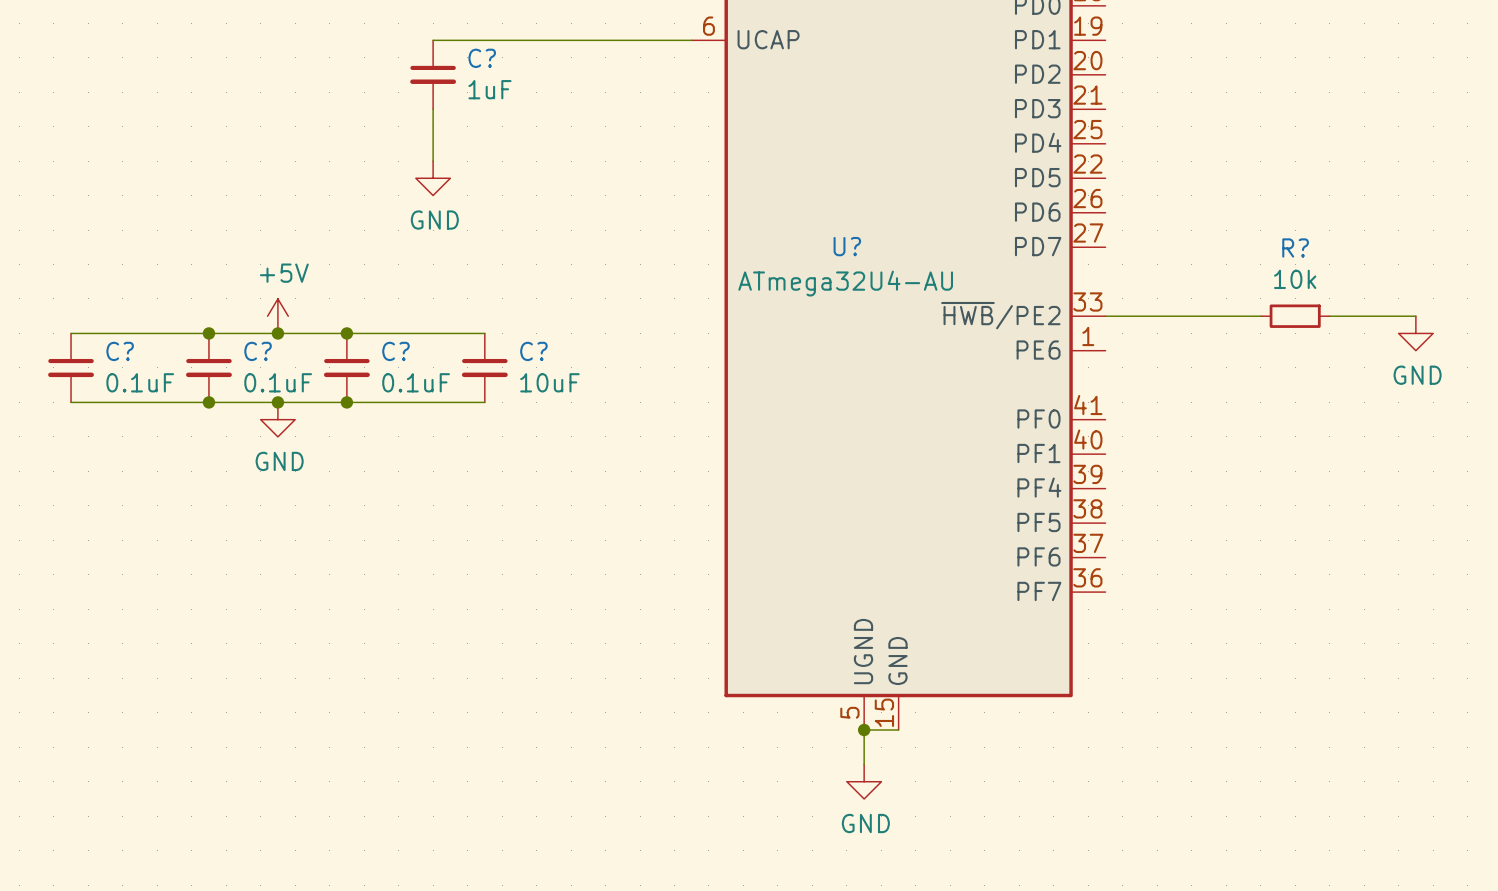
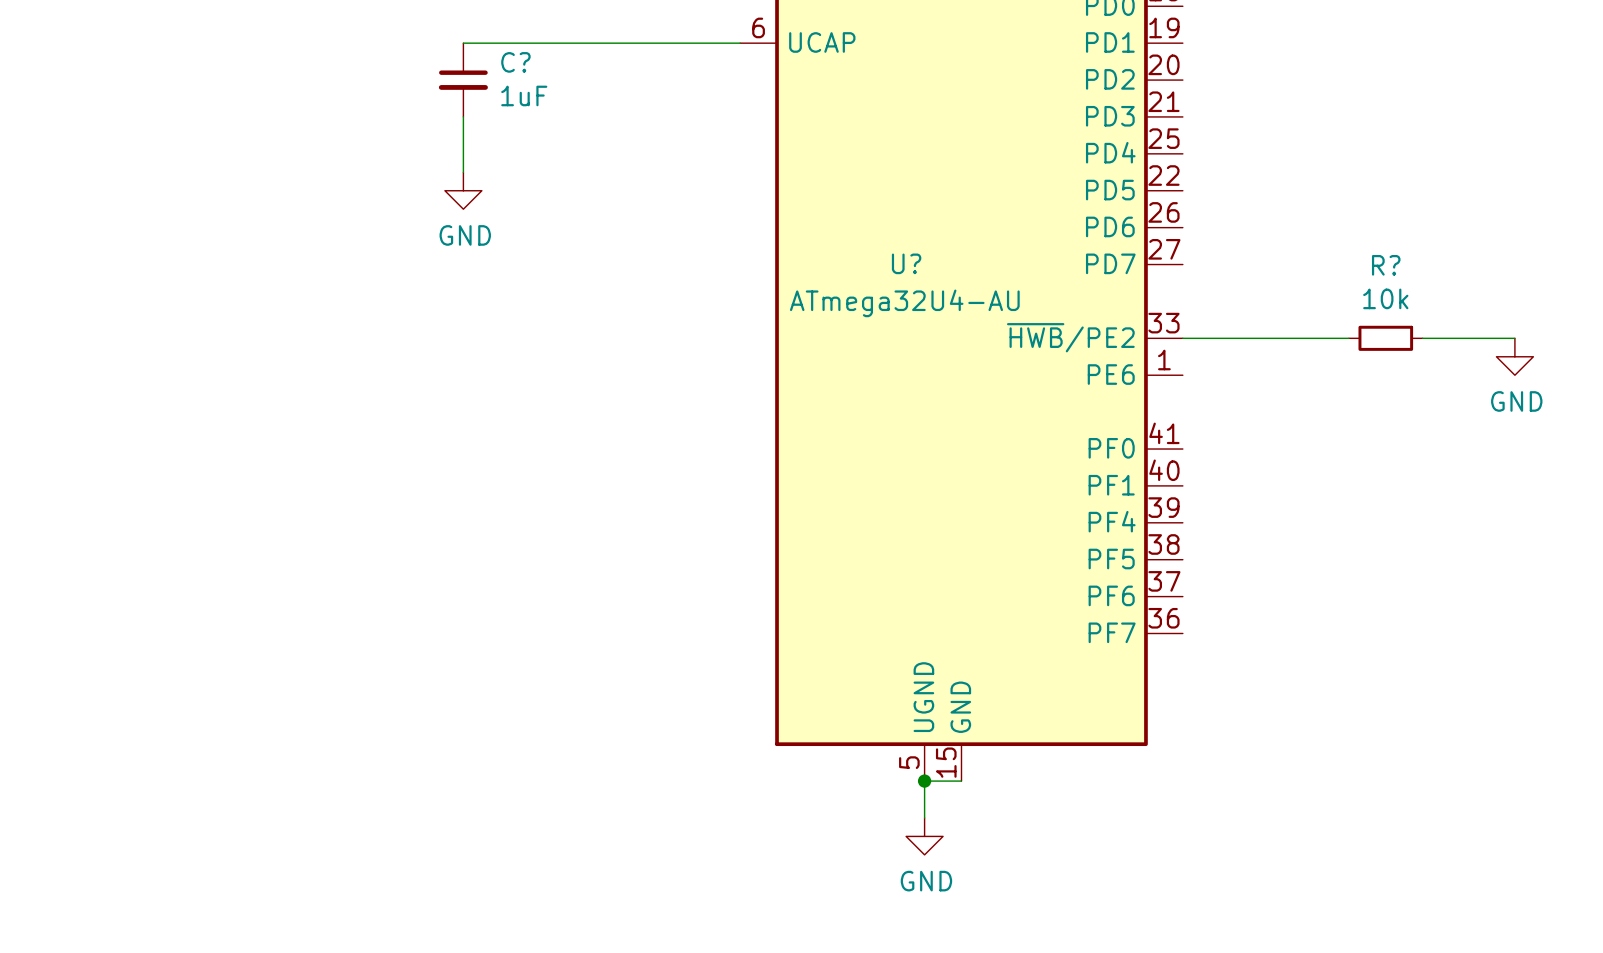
power symbol: +5V (277, 316) -> none
wire: (71, 333) (484, 333) -> none
junction: (208, 333) -> none
junction: (277, 333) -> none
junction: (346, 333) -> none
C?: 0.1uF (71, 367) -> none
C?: 0.1uF (208, 367) -> none
C?: 0.1uF (346, 367) -> none
C?: 10uF (484, 367) -> none
wire: (71, 402) (484, 402) -> none
junction: (208, 402) -> none
junction: (277, 402) -> none
junction: (346, 402) -> none
power symbol: GND (277, 419) -> none

